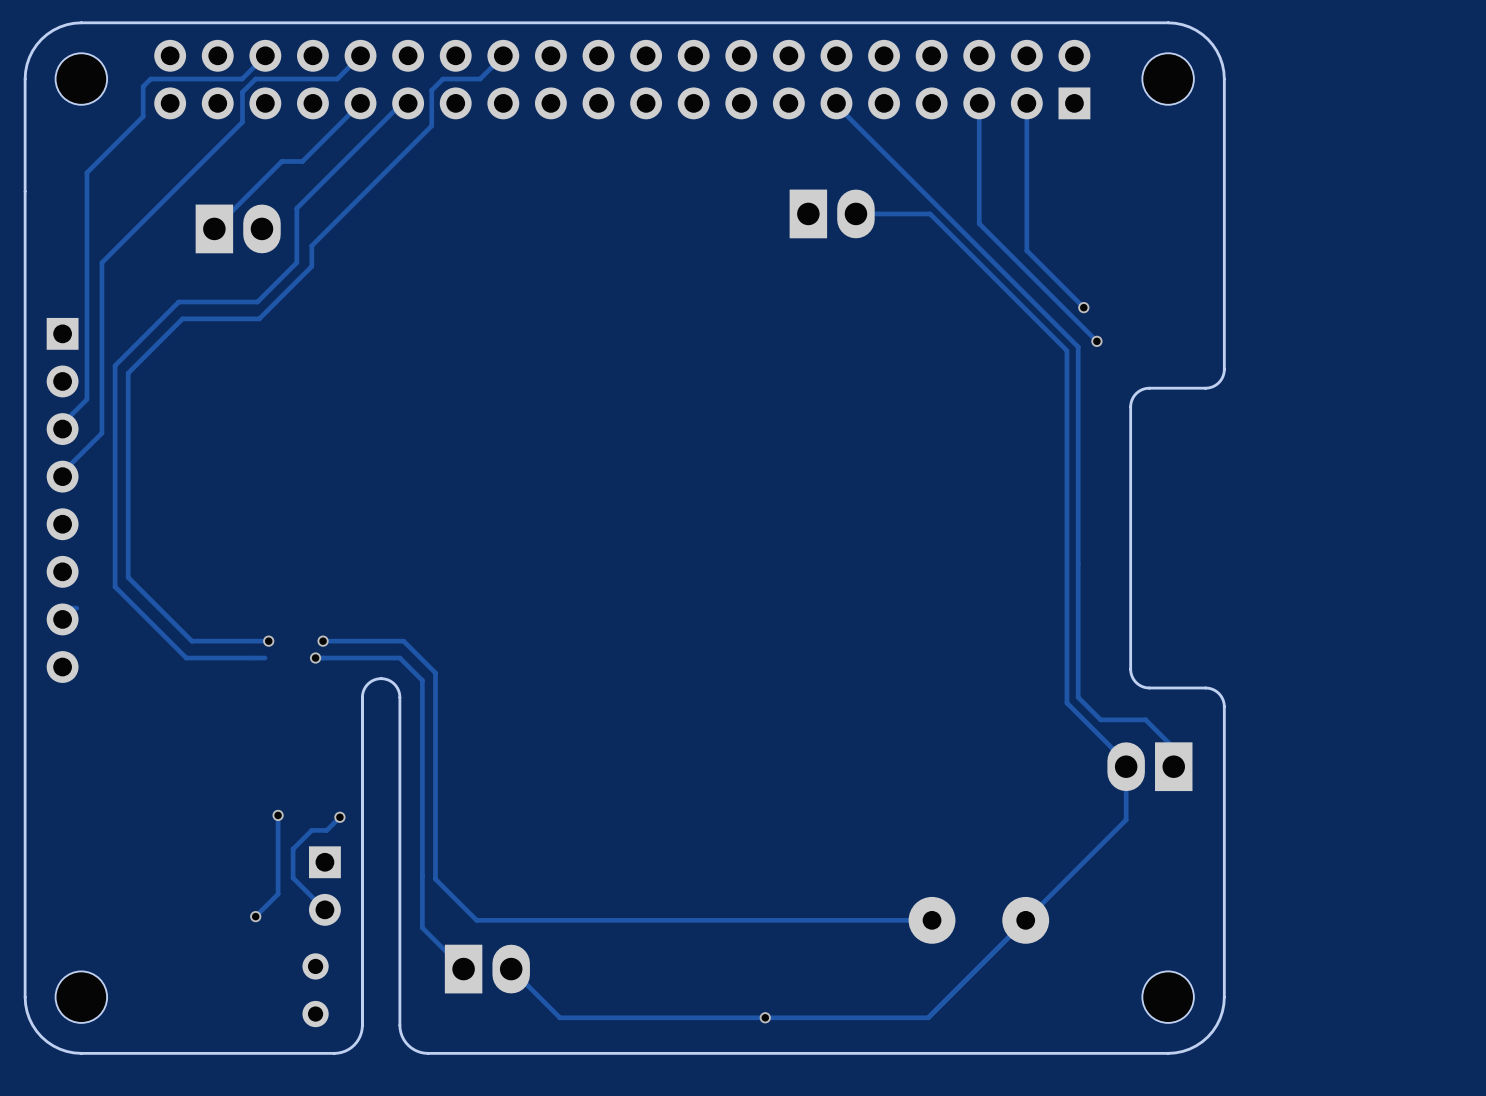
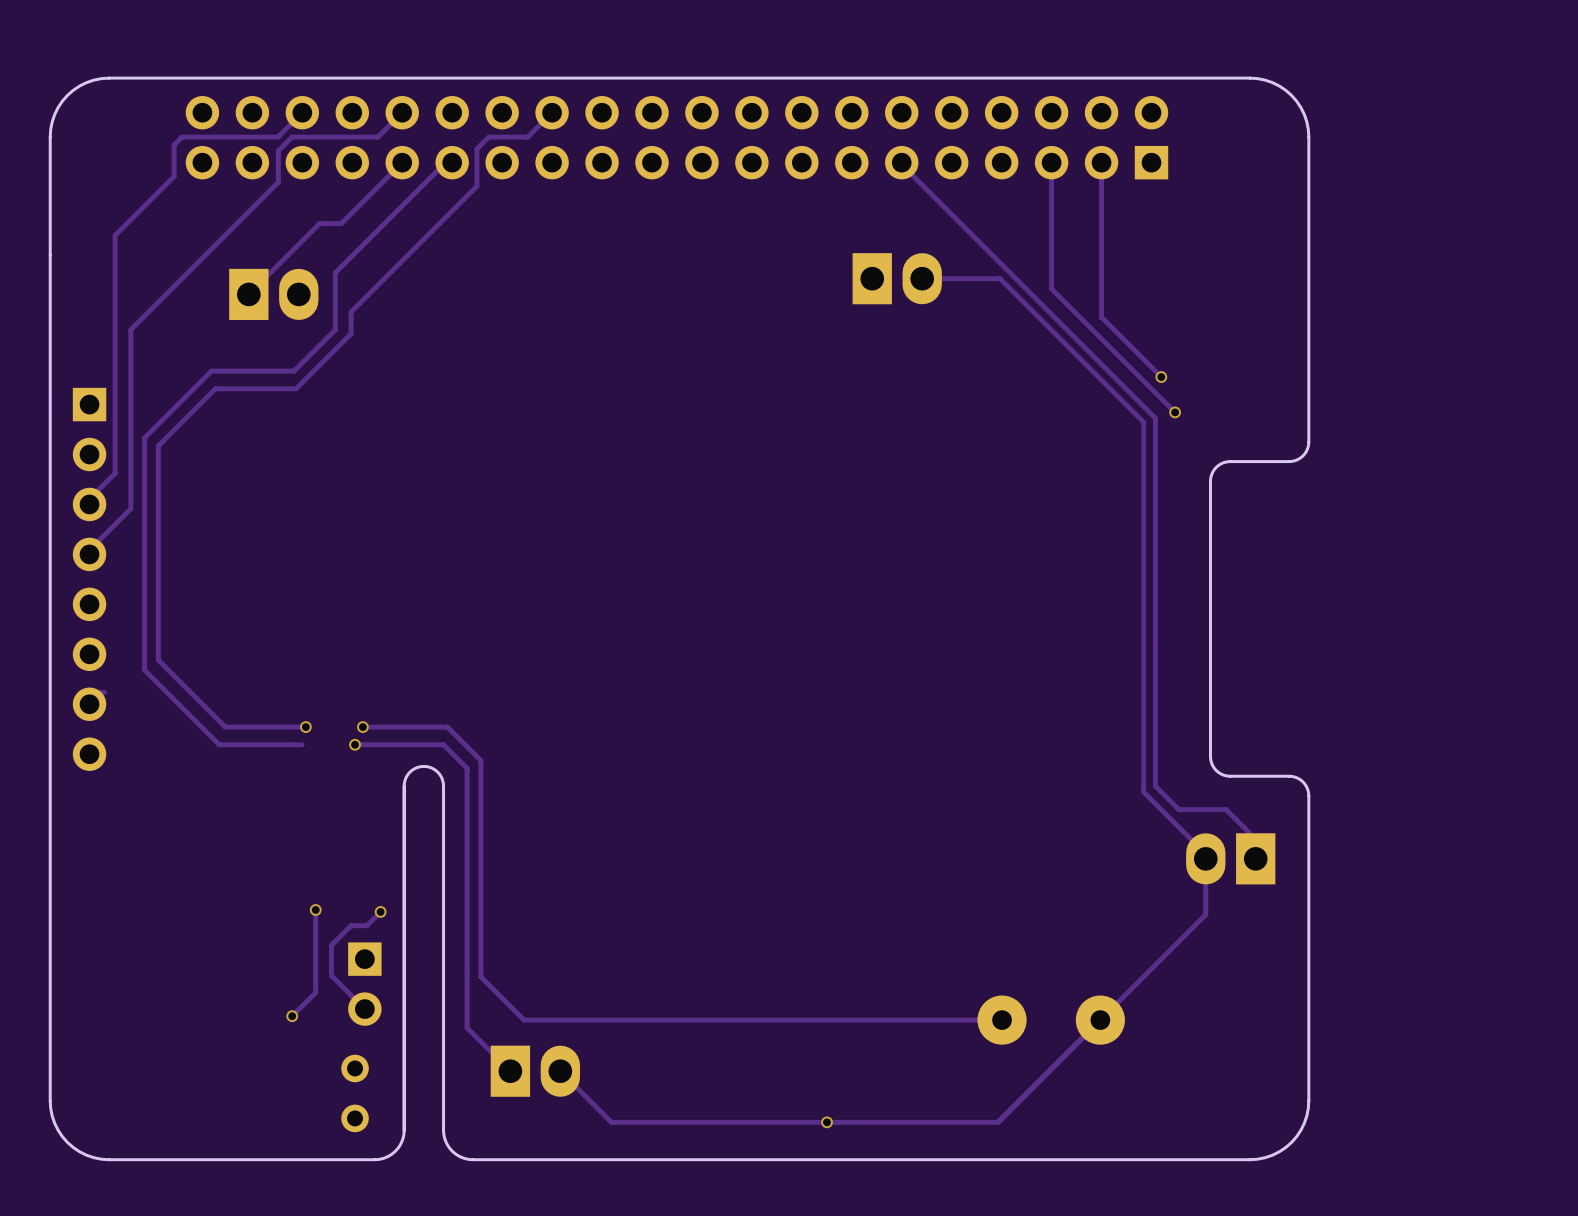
part: (81, 79) -> none
part: (1168, 79) -> none
part: (81, 997) -> none
part: (1168, 997) -> none

